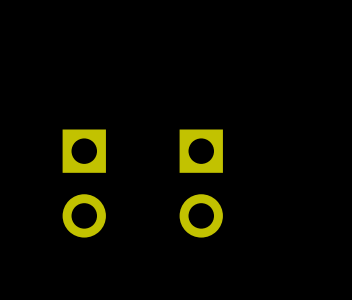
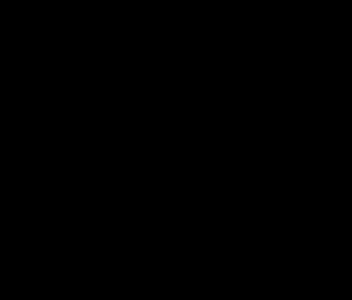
part: (84, 183) -> none
part: (201, 183) -> none

